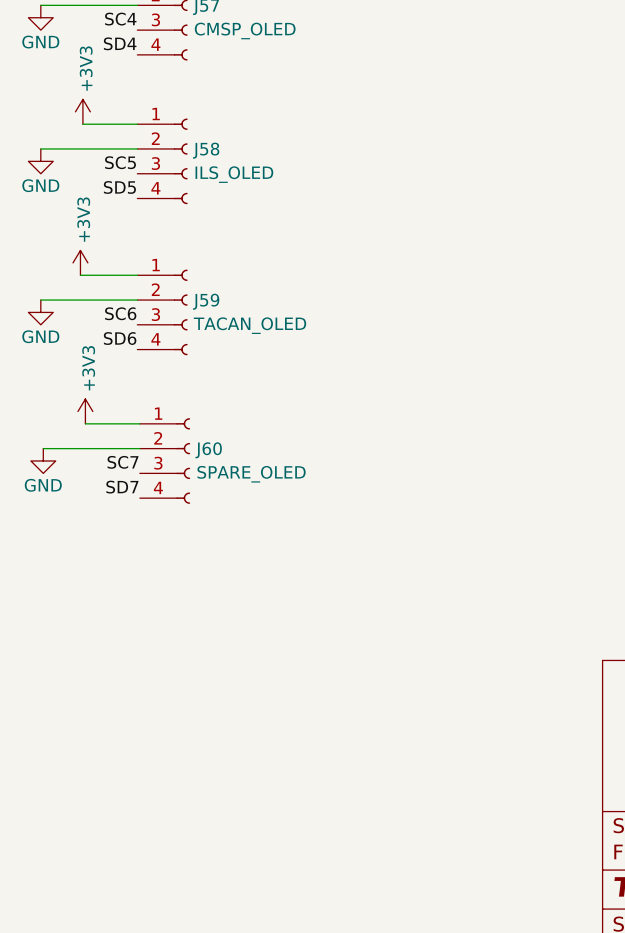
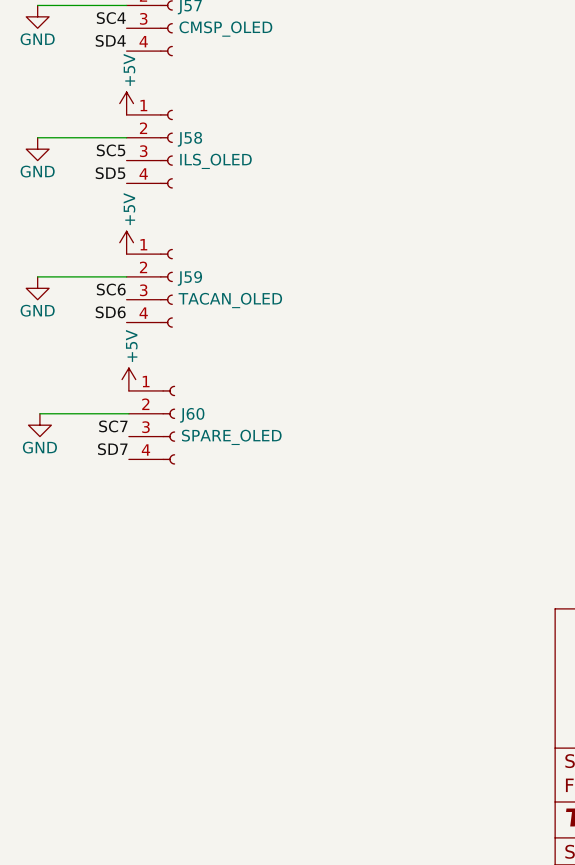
power symbol: +3V3 (82, 111) -> none
power symbol: none -> +5V (126, 103)
wire: (82, 124) (137, 124) -> none
power symbol: +3V3 (80, 262) -> none
power symbol: none -> +5V (126, 242)
wire: (80, 275) (137, 275) -> none
power symbol: +3V3 (85, 411) -> none
power symbol: none -> +5V (128, 379)
wire: (85, 423) (139, 423) -> none

